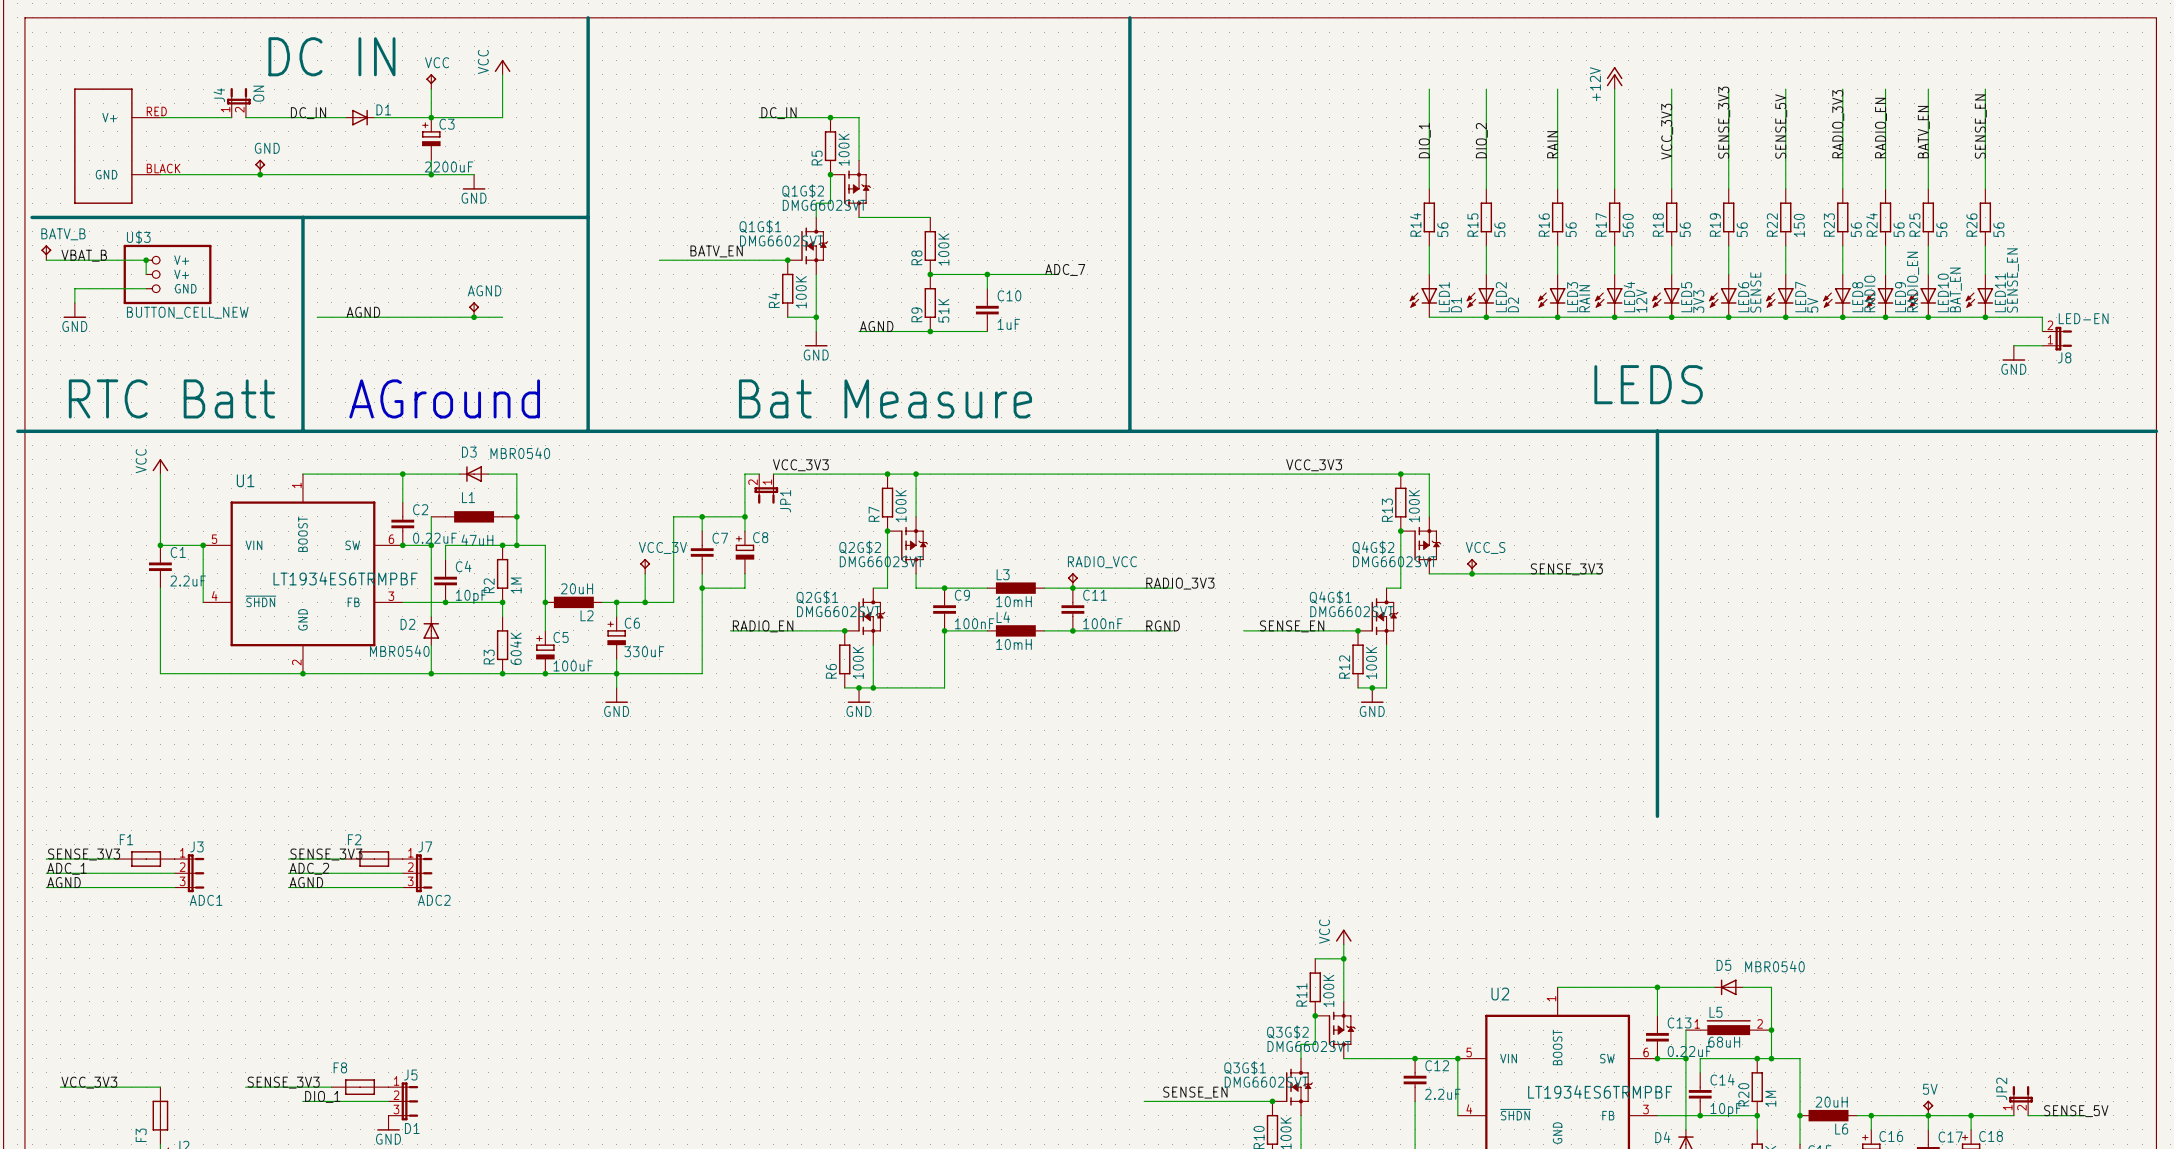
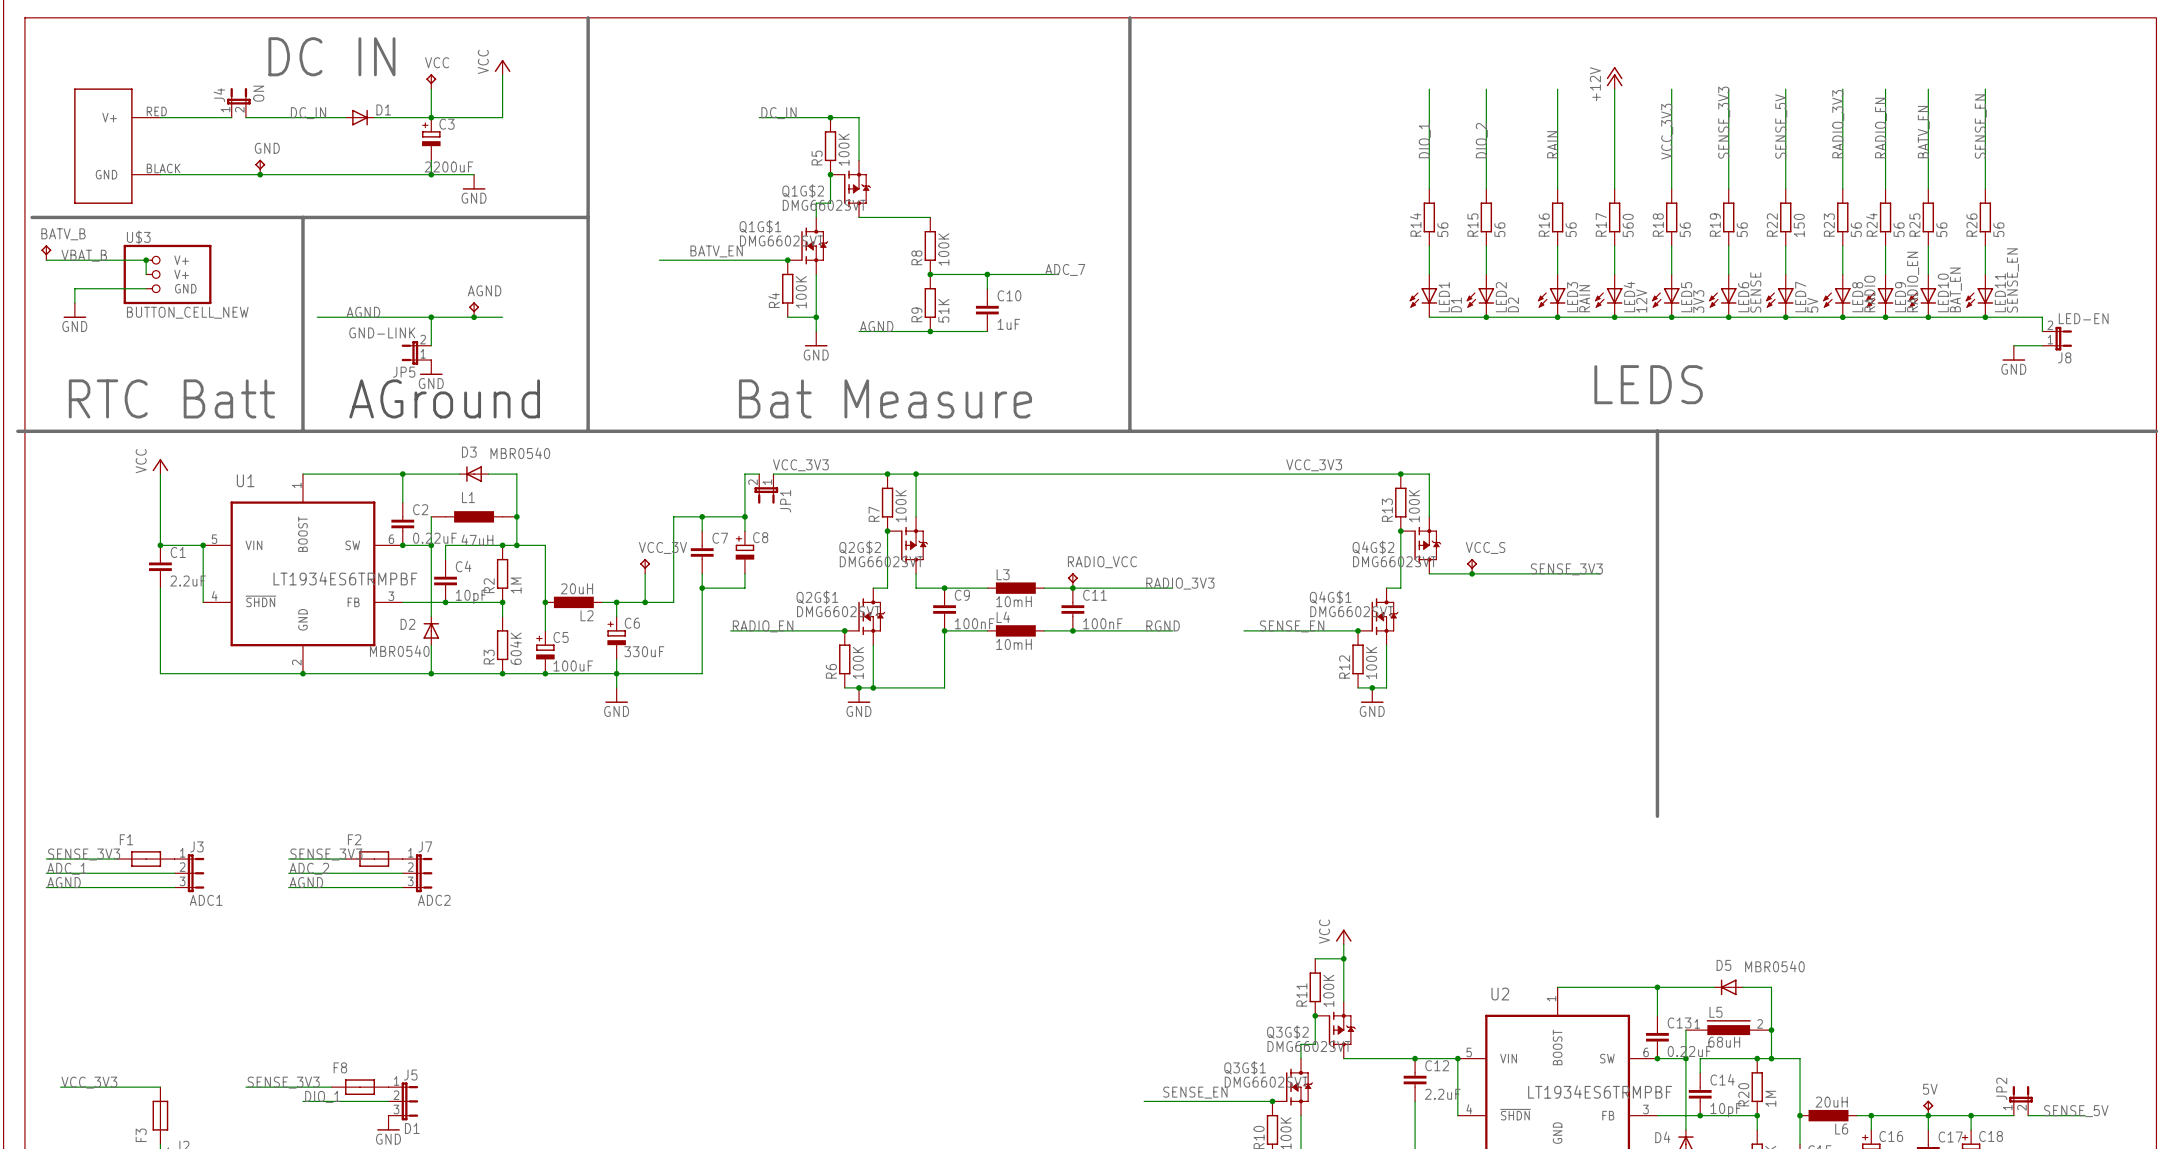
wire: none -> (431, 317) (431, 345)
junction: none -> (431, 317)
JP5: none -> GND-LINK (416, 352)
power symbol: none -> GND (431, 367)

